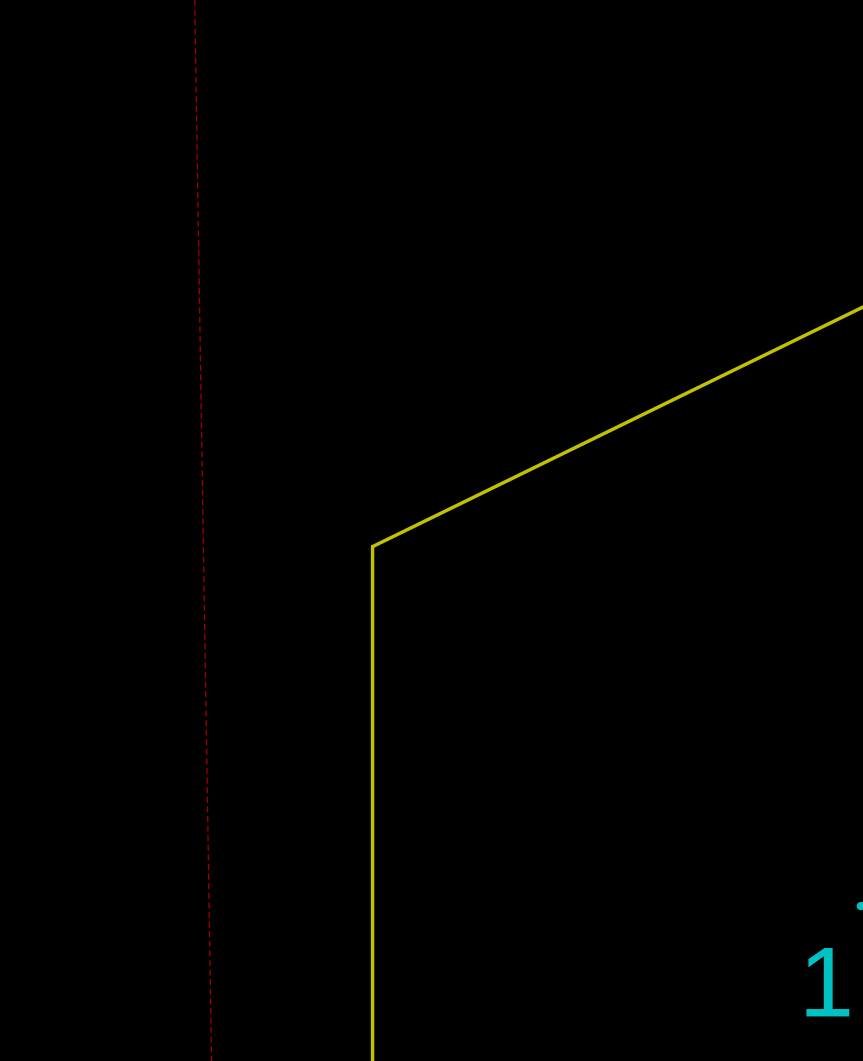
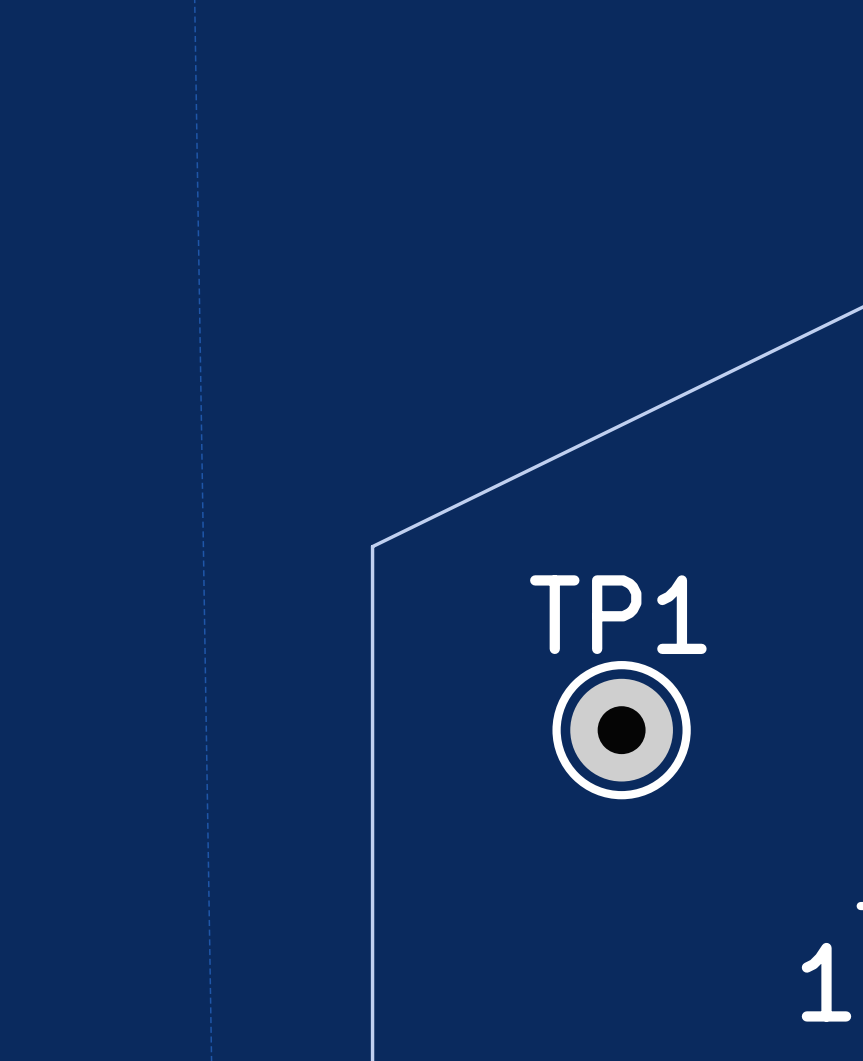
part: none -> (621, 730)

